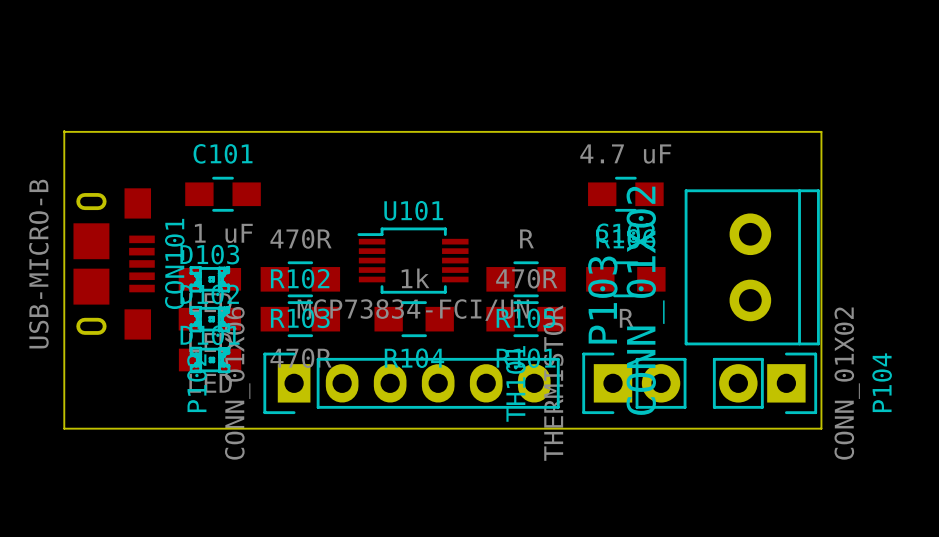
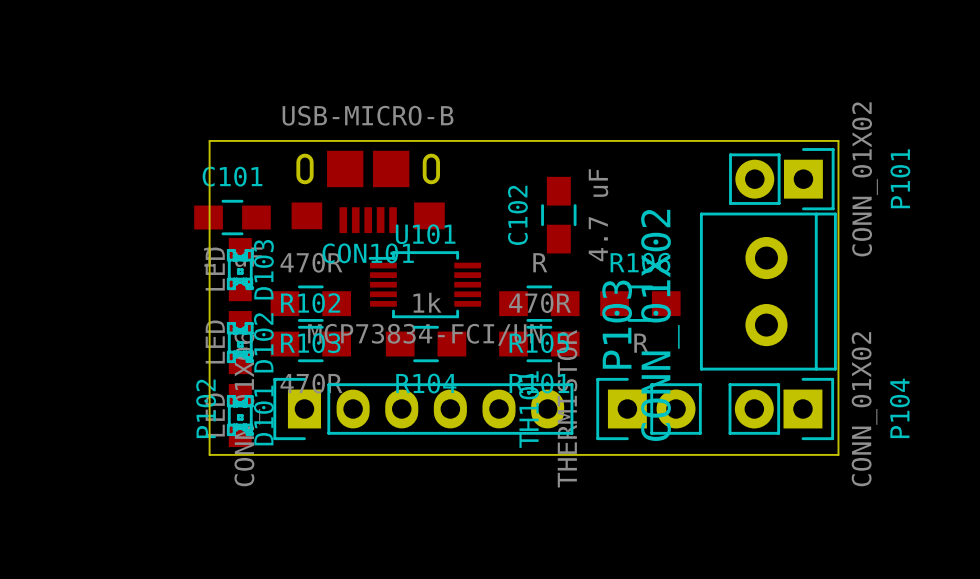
board edge: (64, 130) (64, 428) (200, 428) -> none
board edge: (64, 131) (821, 131) -> (209, 454) (209, 140) (838, 140) (838, 154)
P101: none -> CONN_01X02 (781, 179)
C102 rotation: 0° (625, 194) -> 90° clockwise (558, 215)
C102 position: (625, 194) -> (558, 215)
CON101 rotation: 0° (114, 263) -> 90° clockwise (368, 191)
CON101 position: (114, 263) -> (368, 191)
D103 rotation: 0° (209, 279) -> 90° clockwise (240, 269)
D103 position: (209, 279) -> (240, 269)
D102 rotation: 0° (209, 319) -> 90° clockwise (240, 342)
D101 rotation: 0° (210, 360) -> 90° clockwise (240, 415)

